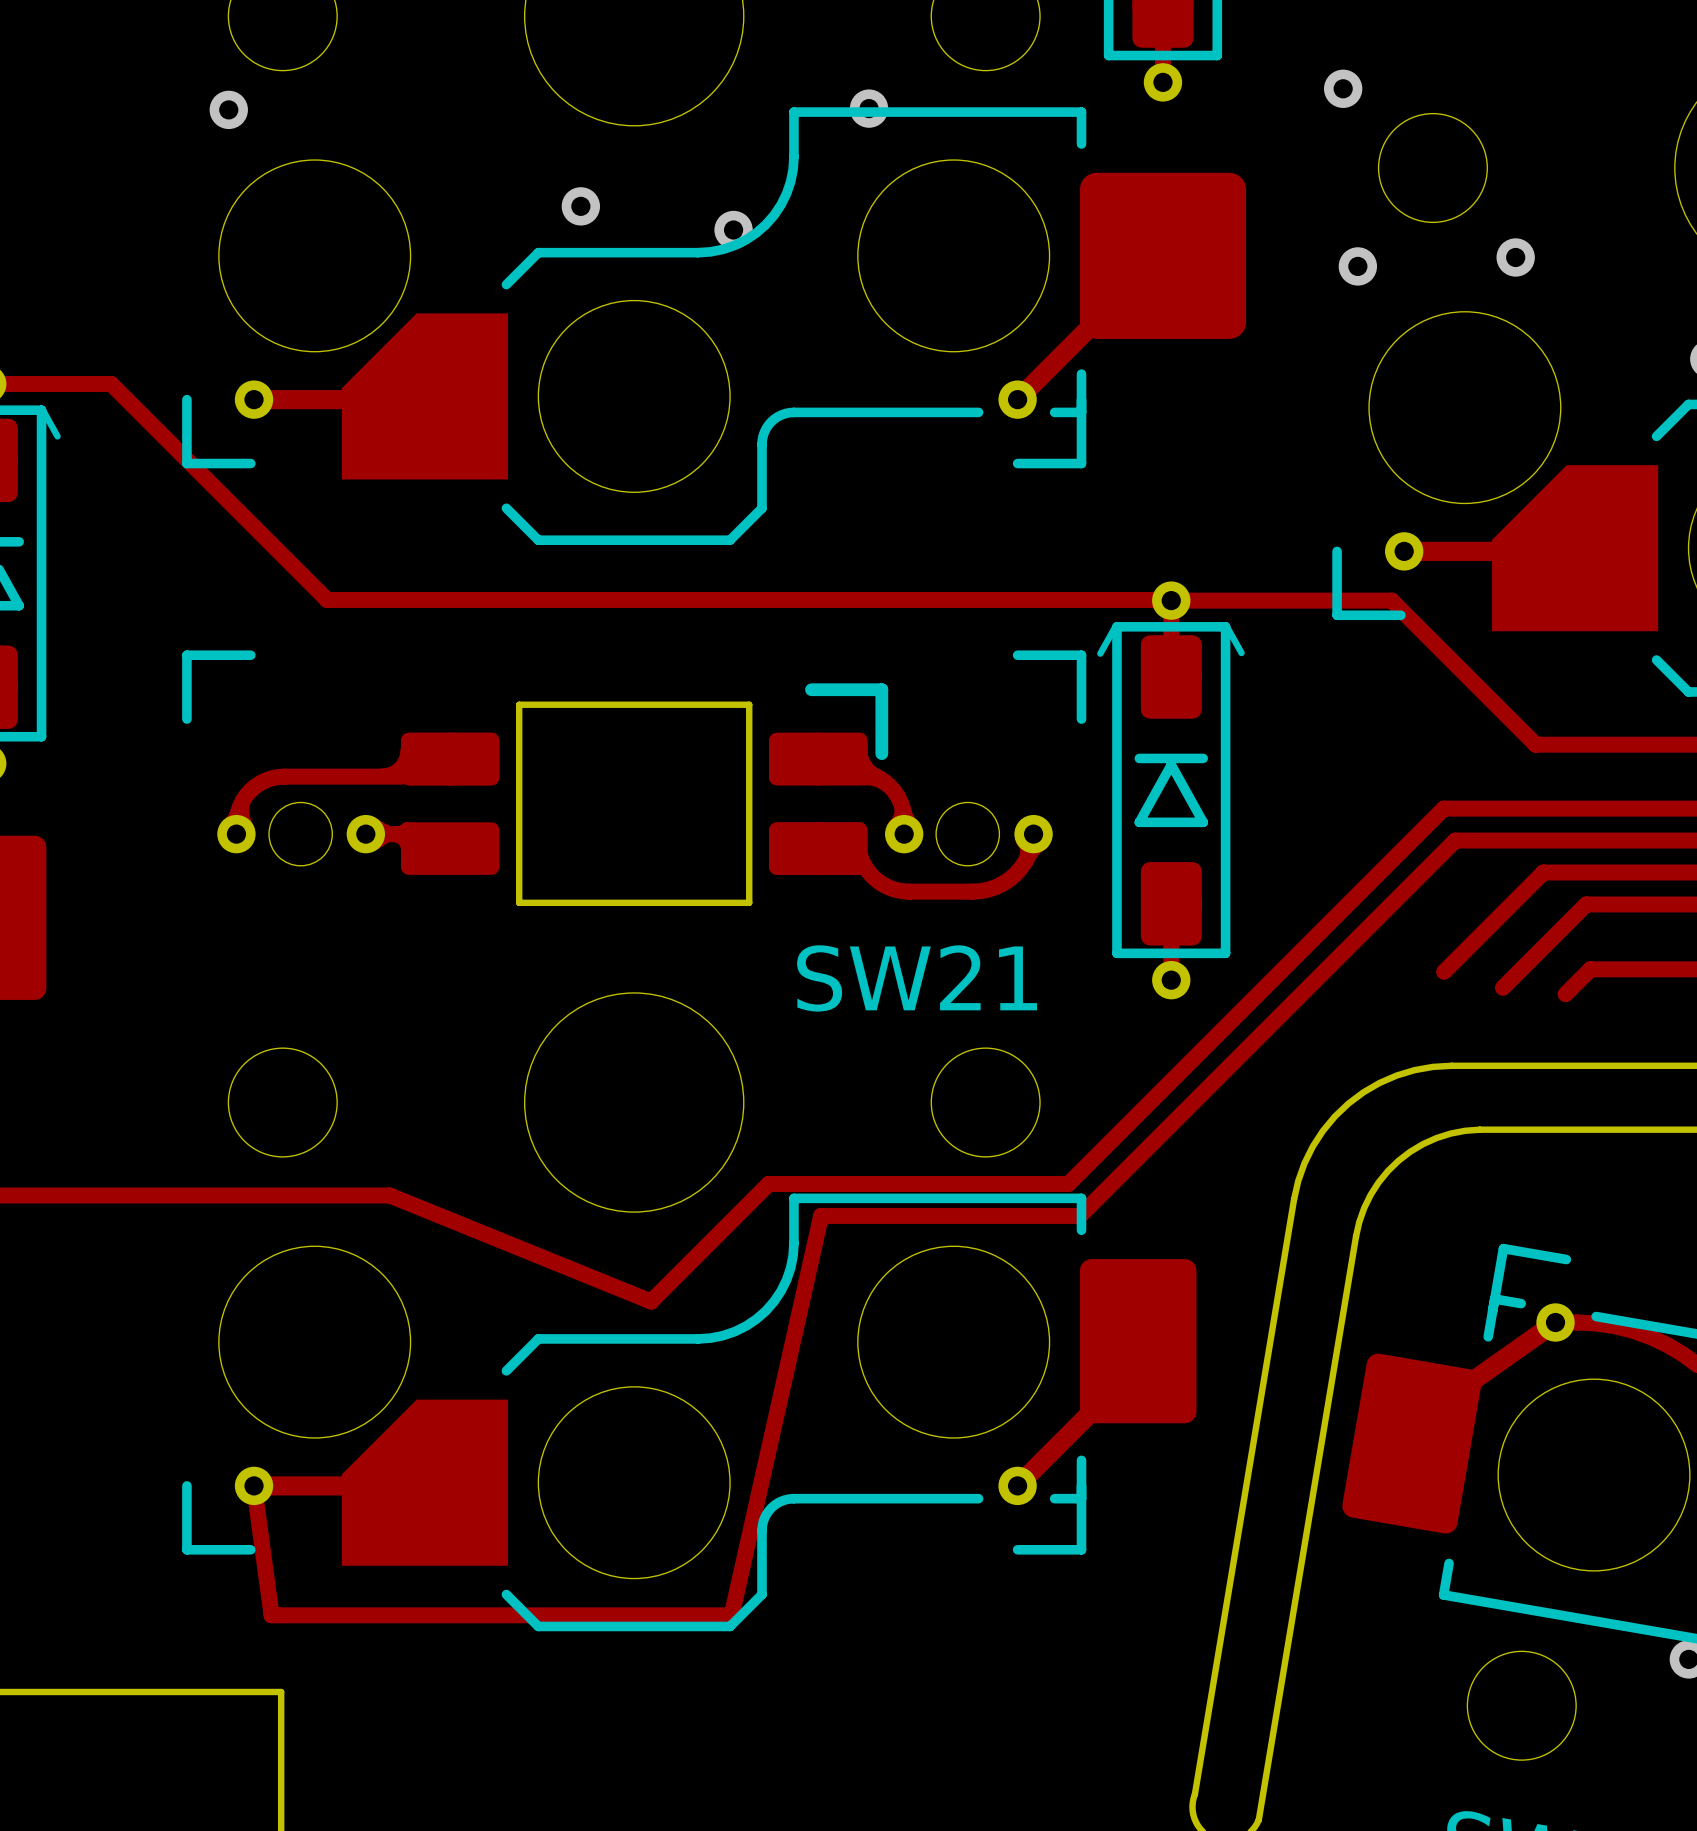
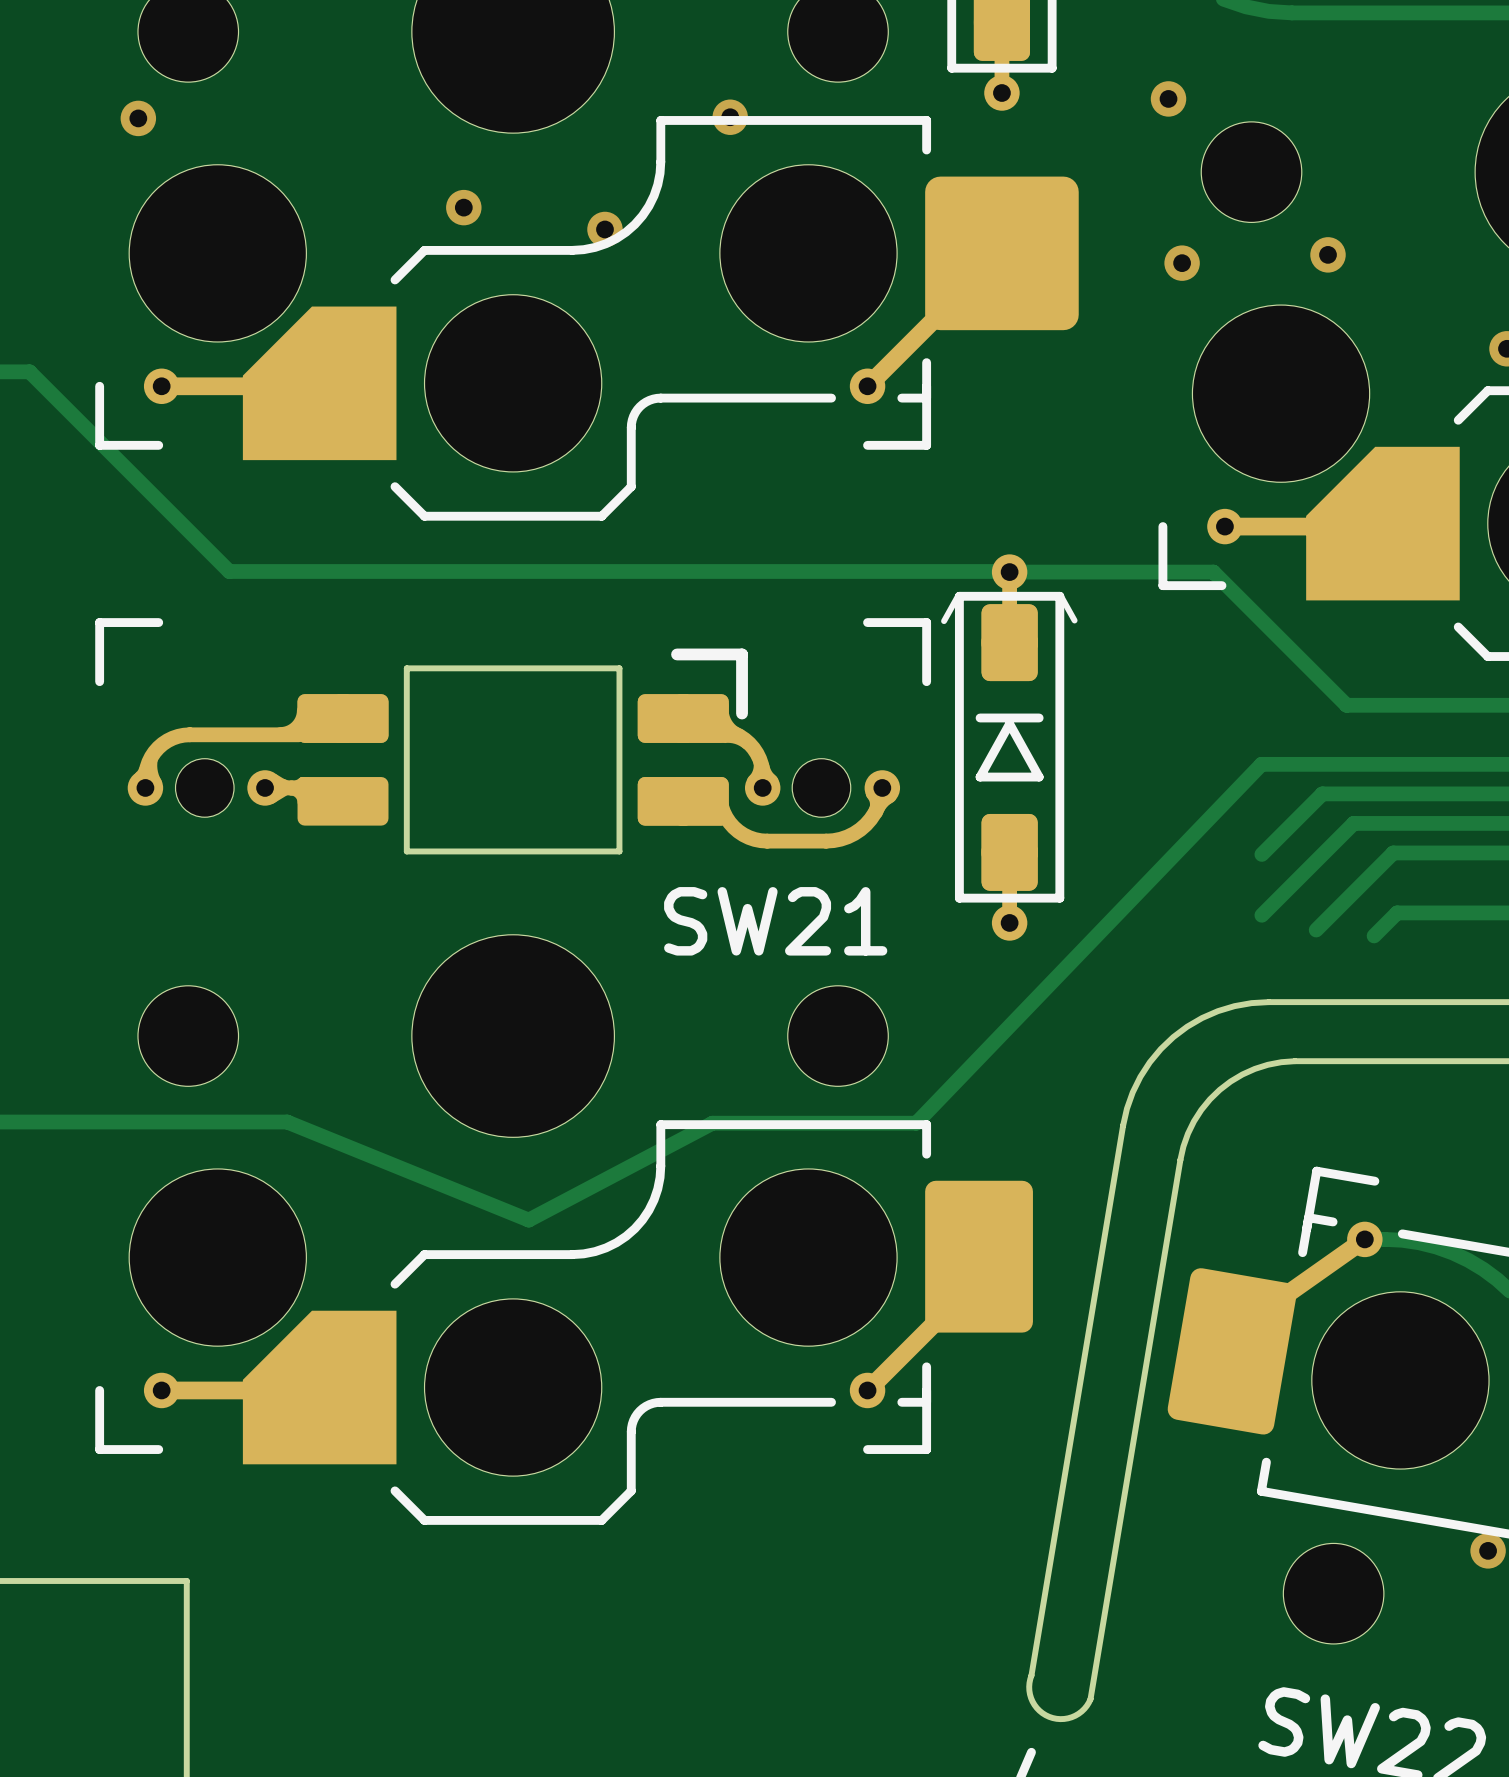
track: (1443, 808) (1068, 1184) (768, 1184) (651, 1301) -> (1261, 764) (916, 1123) (712, 1123) (528, 1220)
track: (1509, 840) (1455, 840) (1079, 1215) (821, 1215) (731, 1615) (271, 1615) (254, 1485) -> (1322, 793) (1261, 854)

